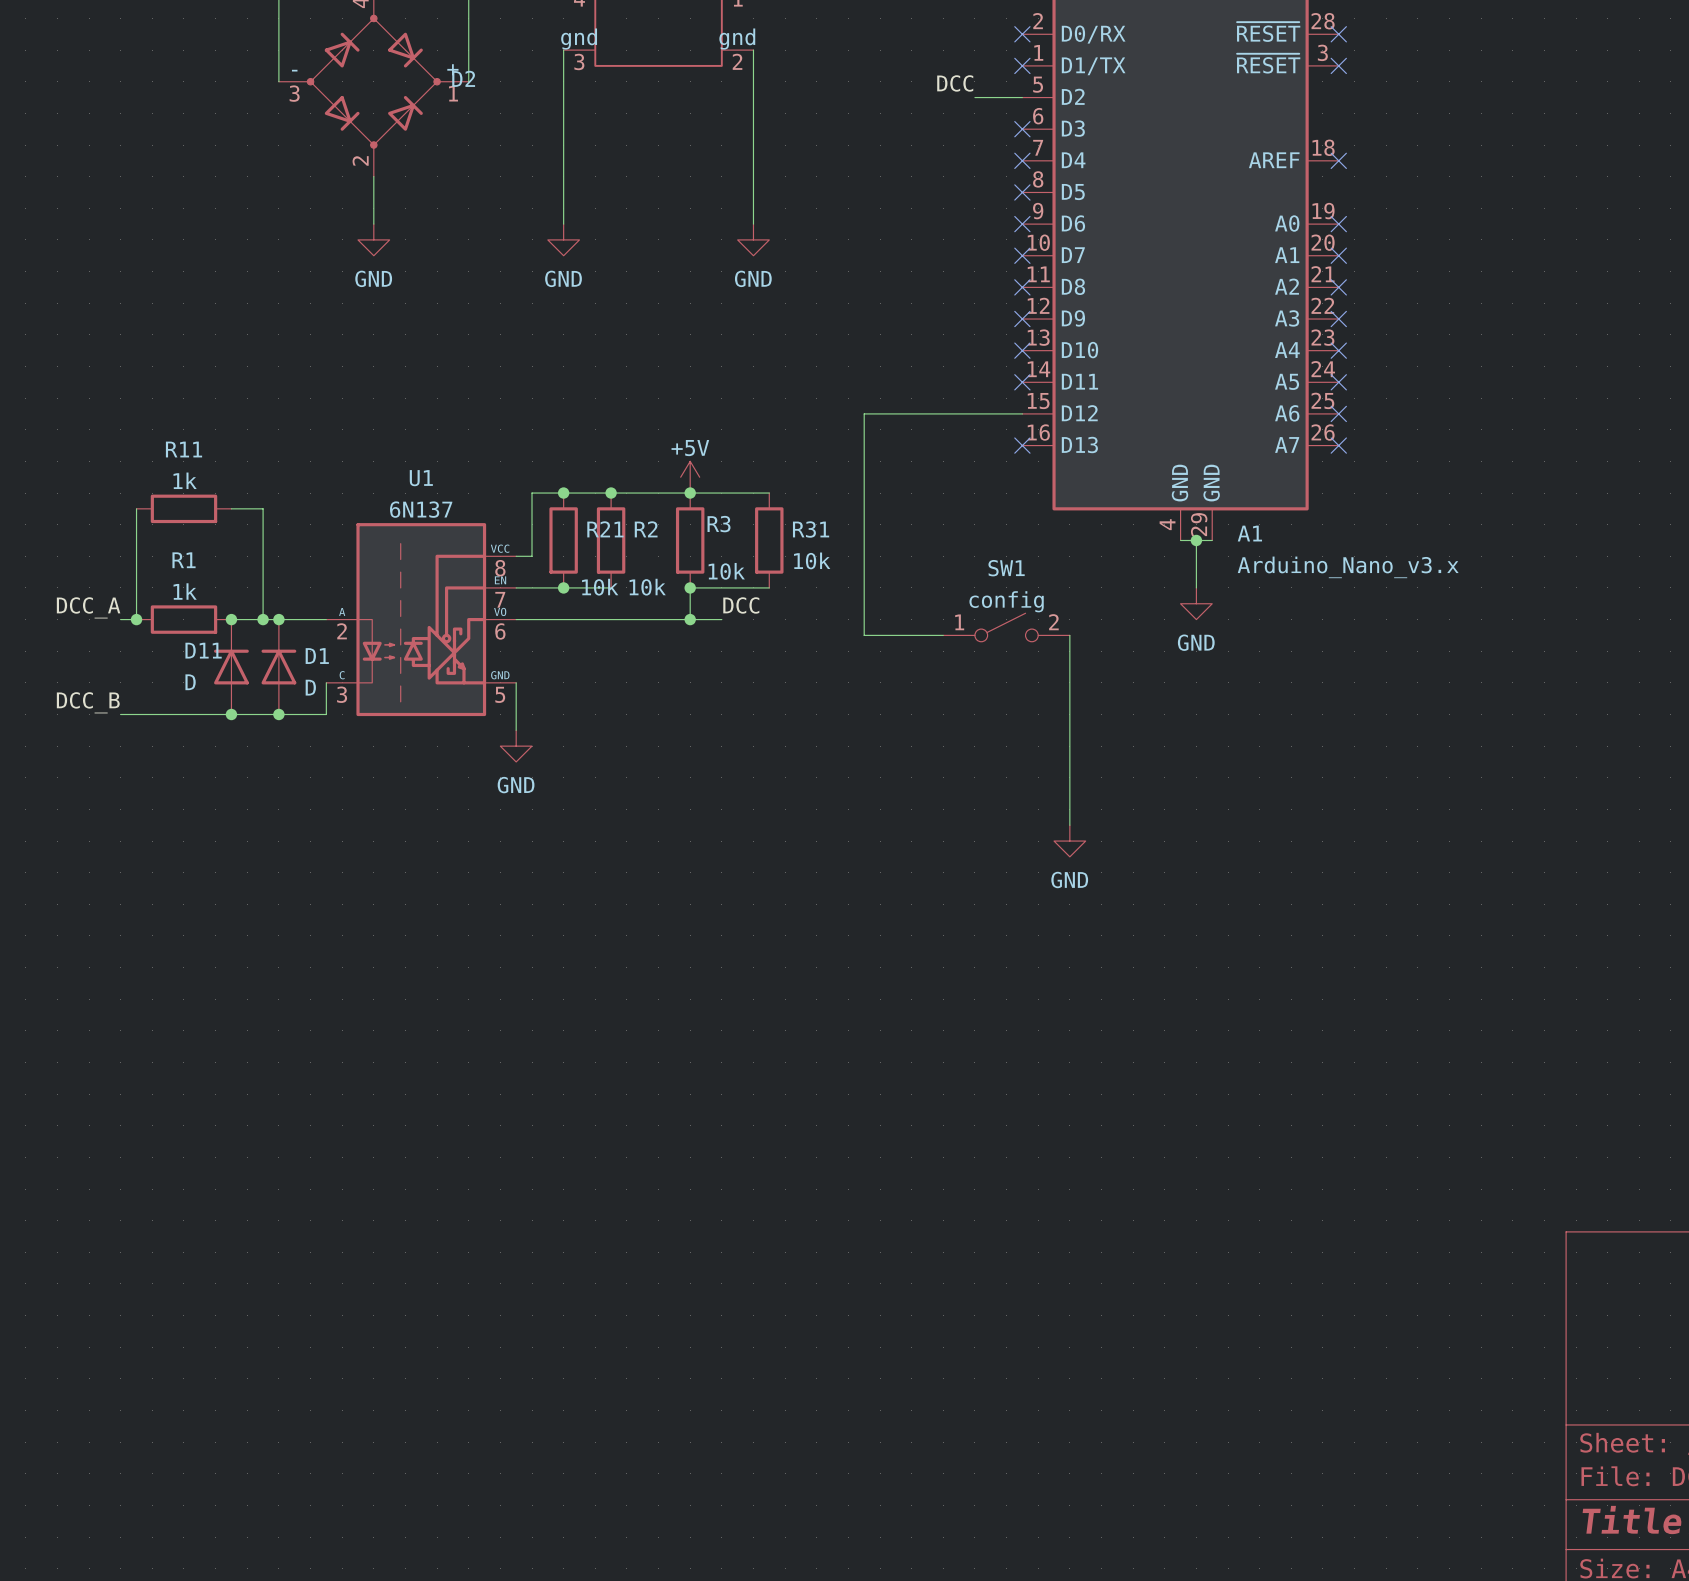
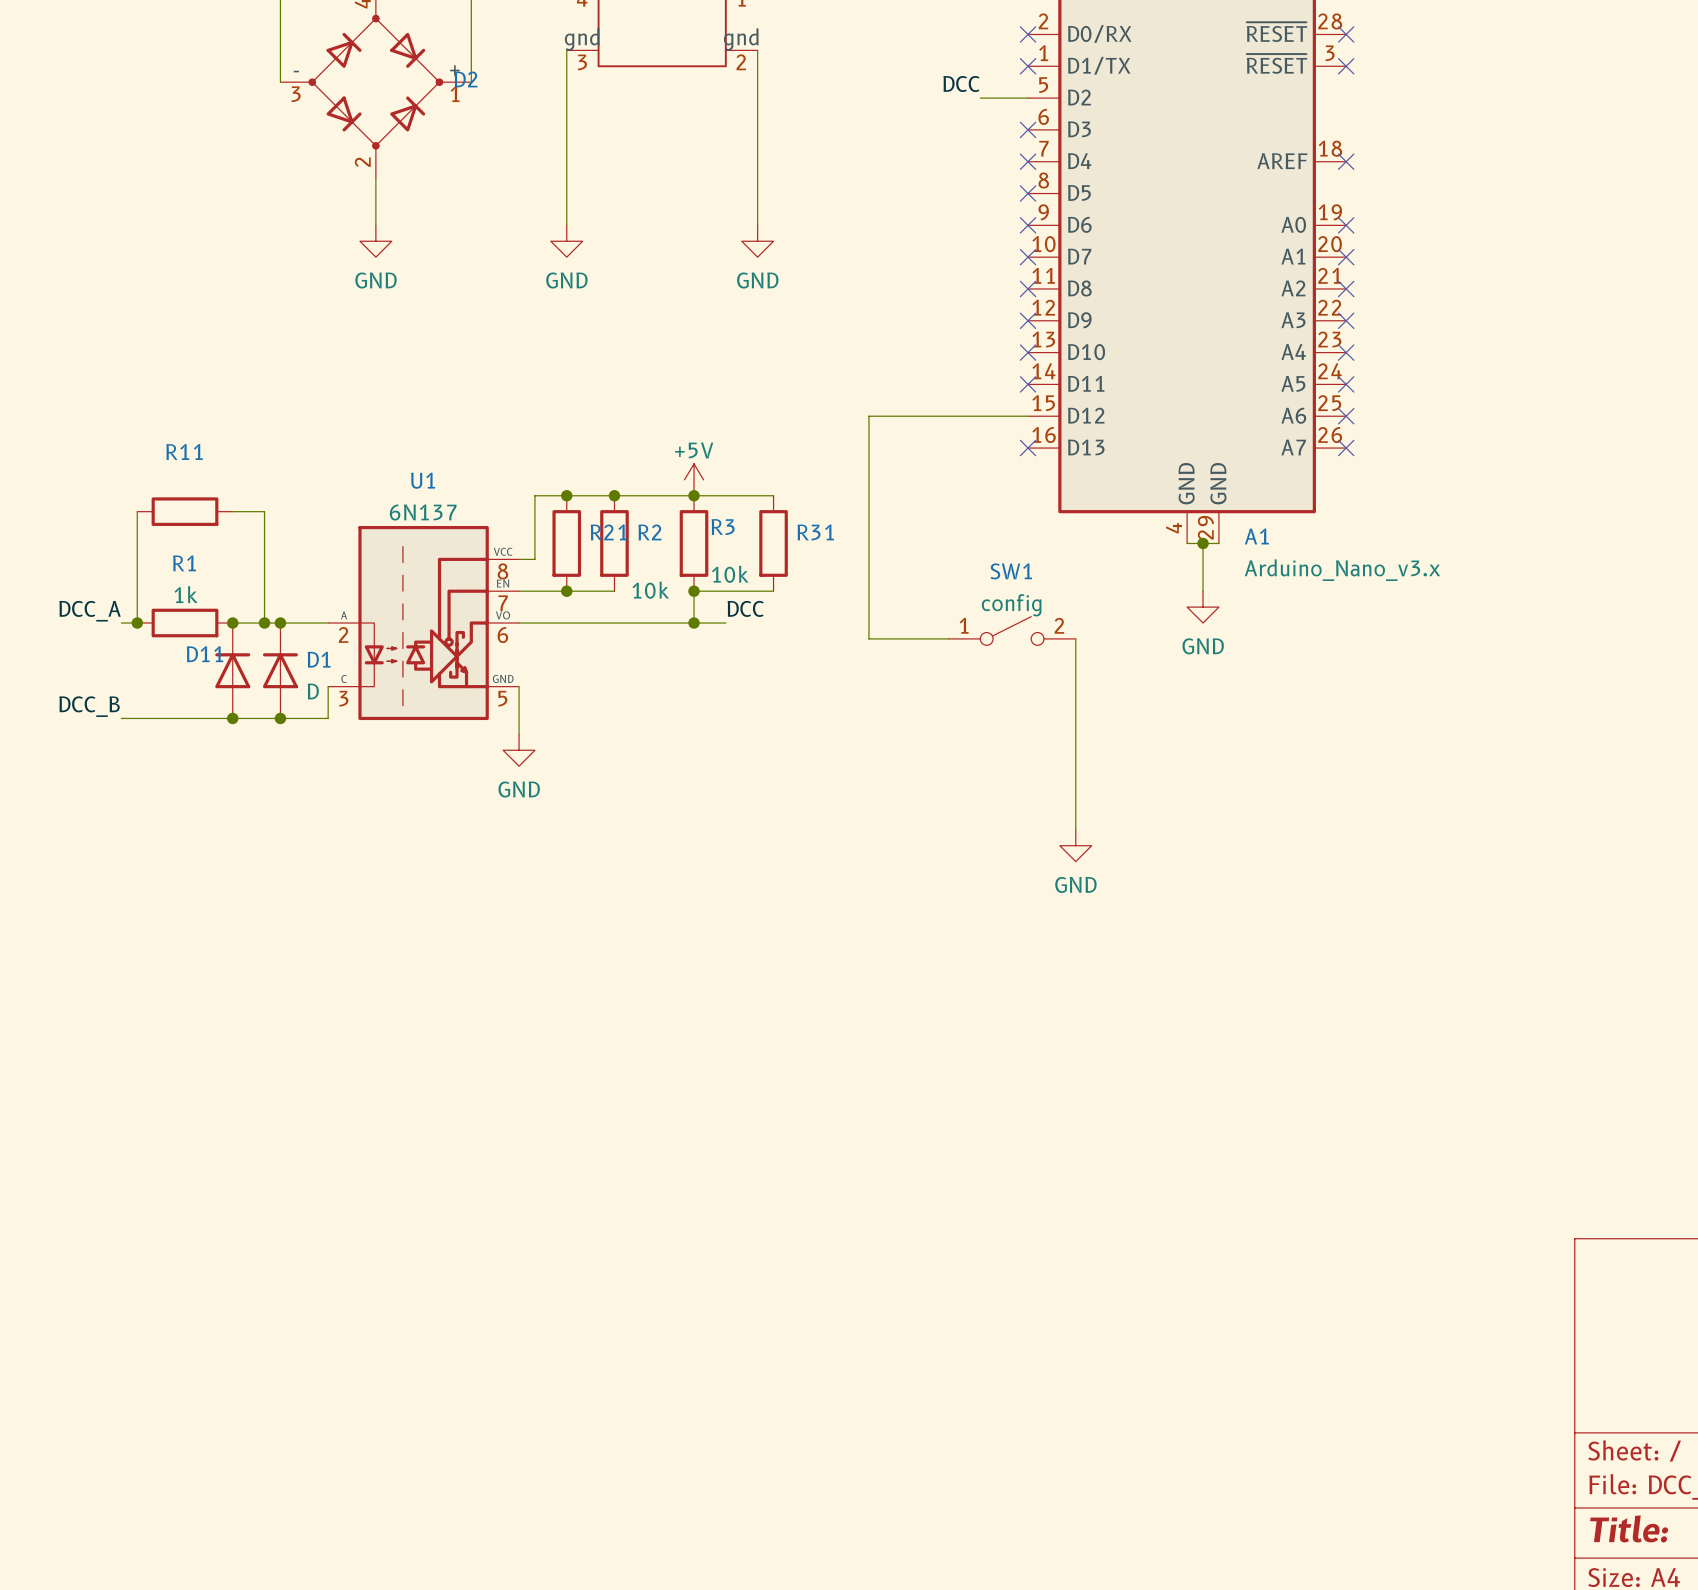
R11 value: 1k (185, 480) -> none
R31 value: 10k (812, 560) -> none
R21 value: 10k (600, 587) -> none
D11 value: D (190, 682) -> none

